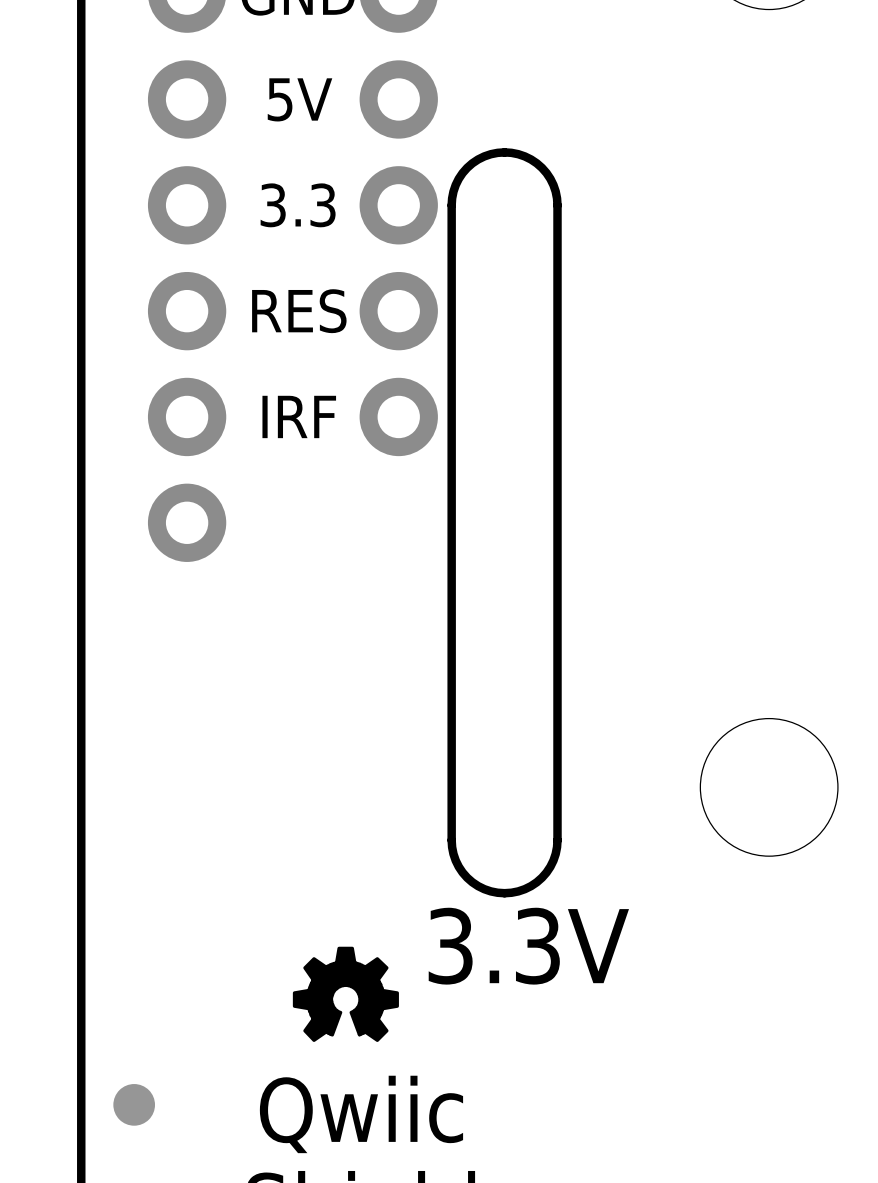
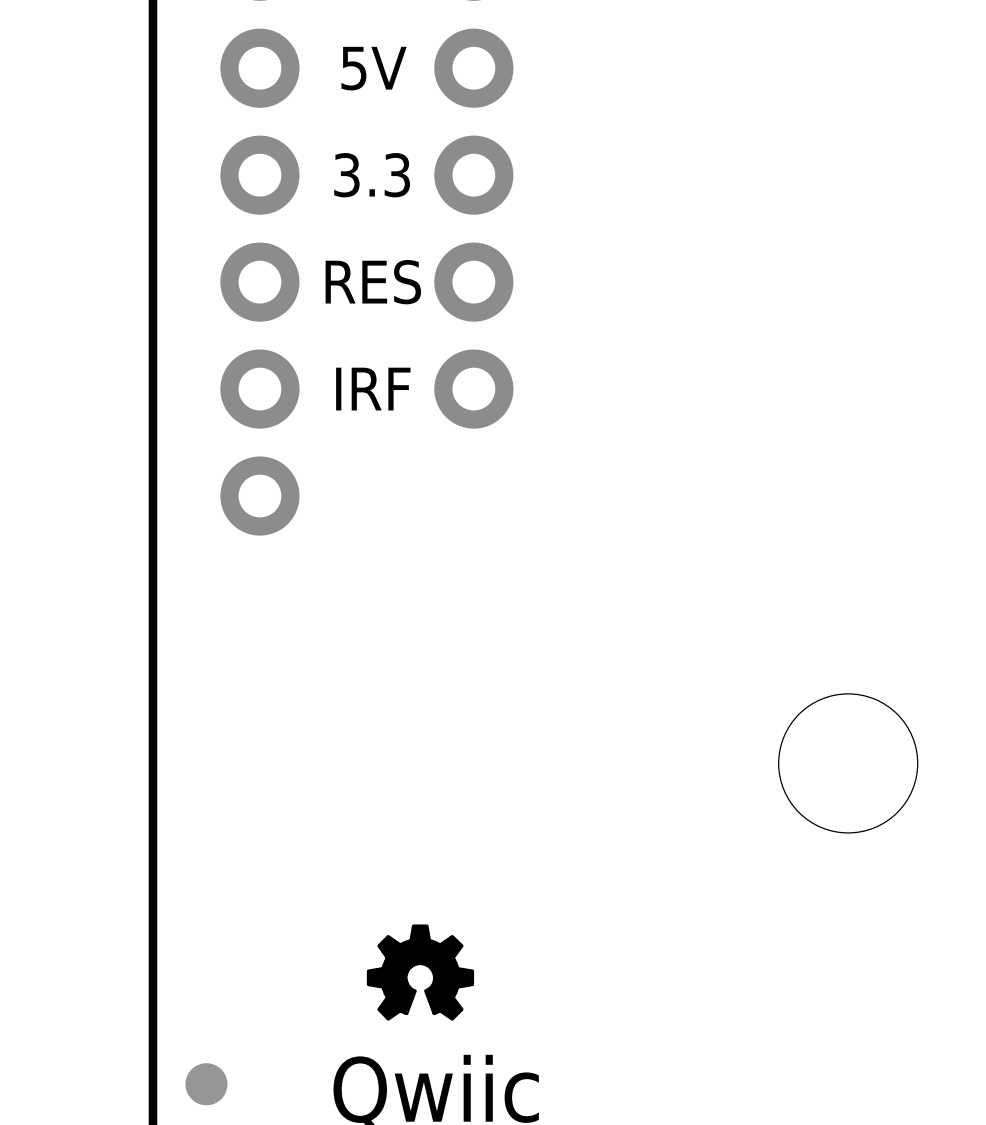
line: (504, 152) (484, 156) (467, 167) (455, 185) (451, 205) (452, 847) (458, 866) (472, 882) (490, 891) (504, 893) (524, 889) (542, 877) (553, 860) (557, 840) (557, 198) (550, 178) (536, 163) (518, 154) (504, 152) -> none
text: 3.3V (528, 946) -> none

